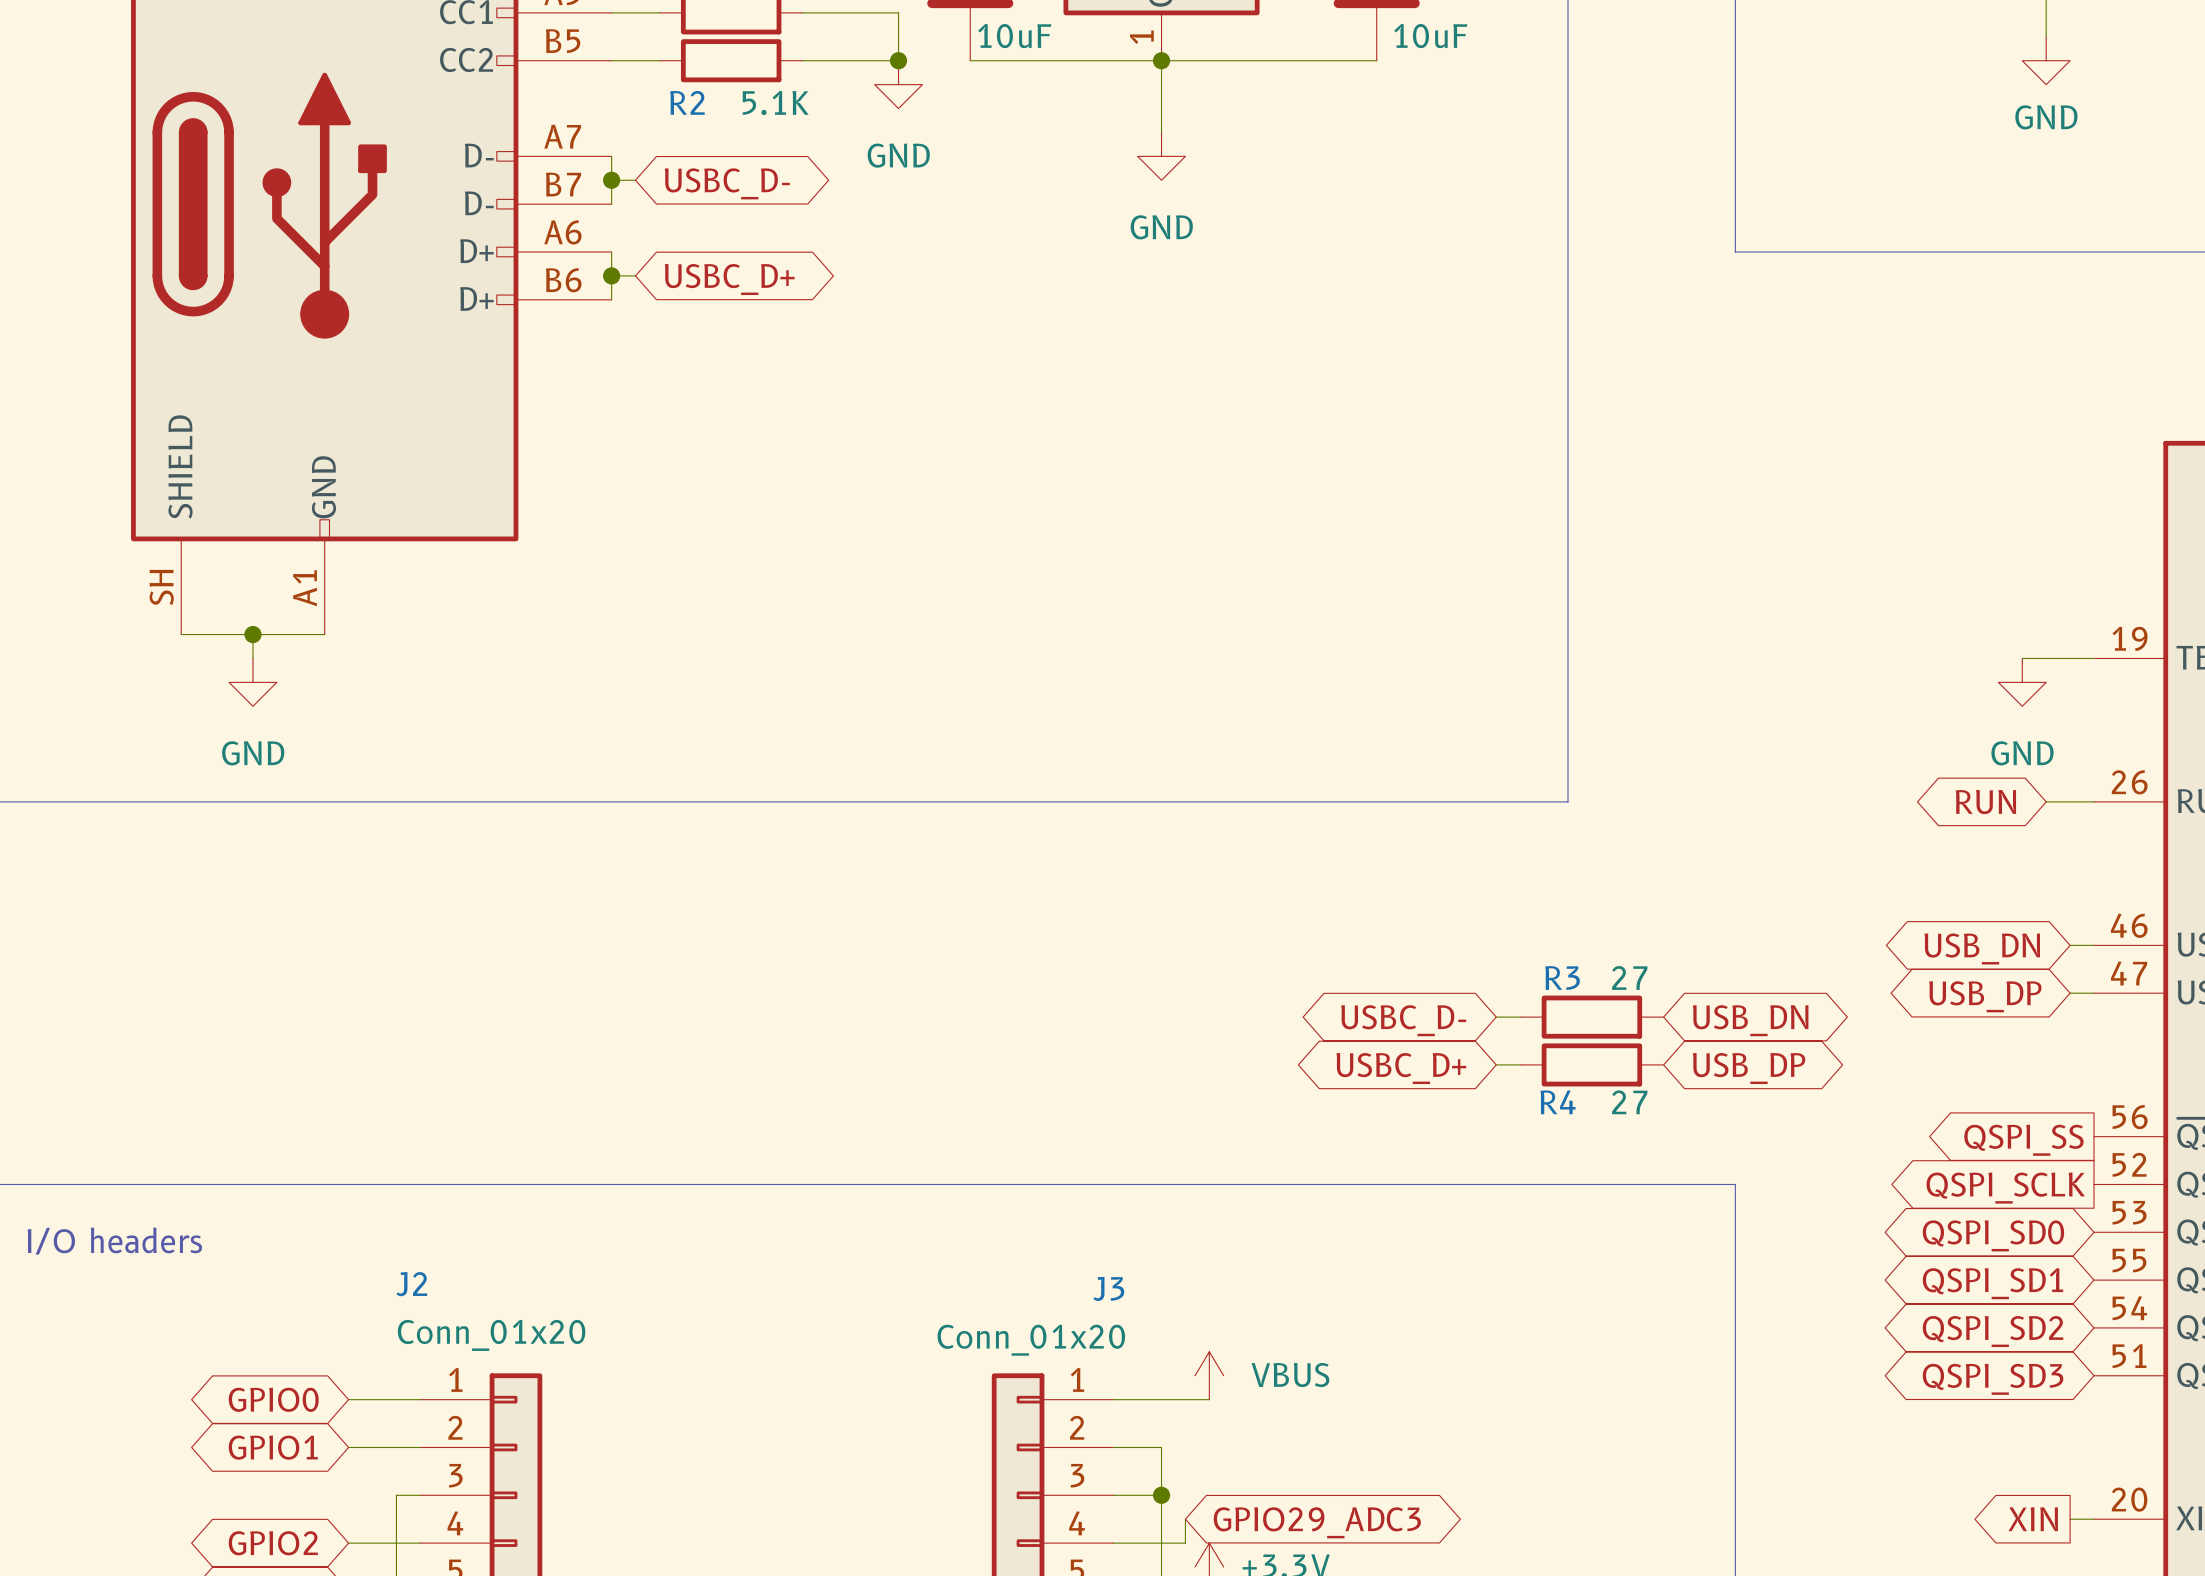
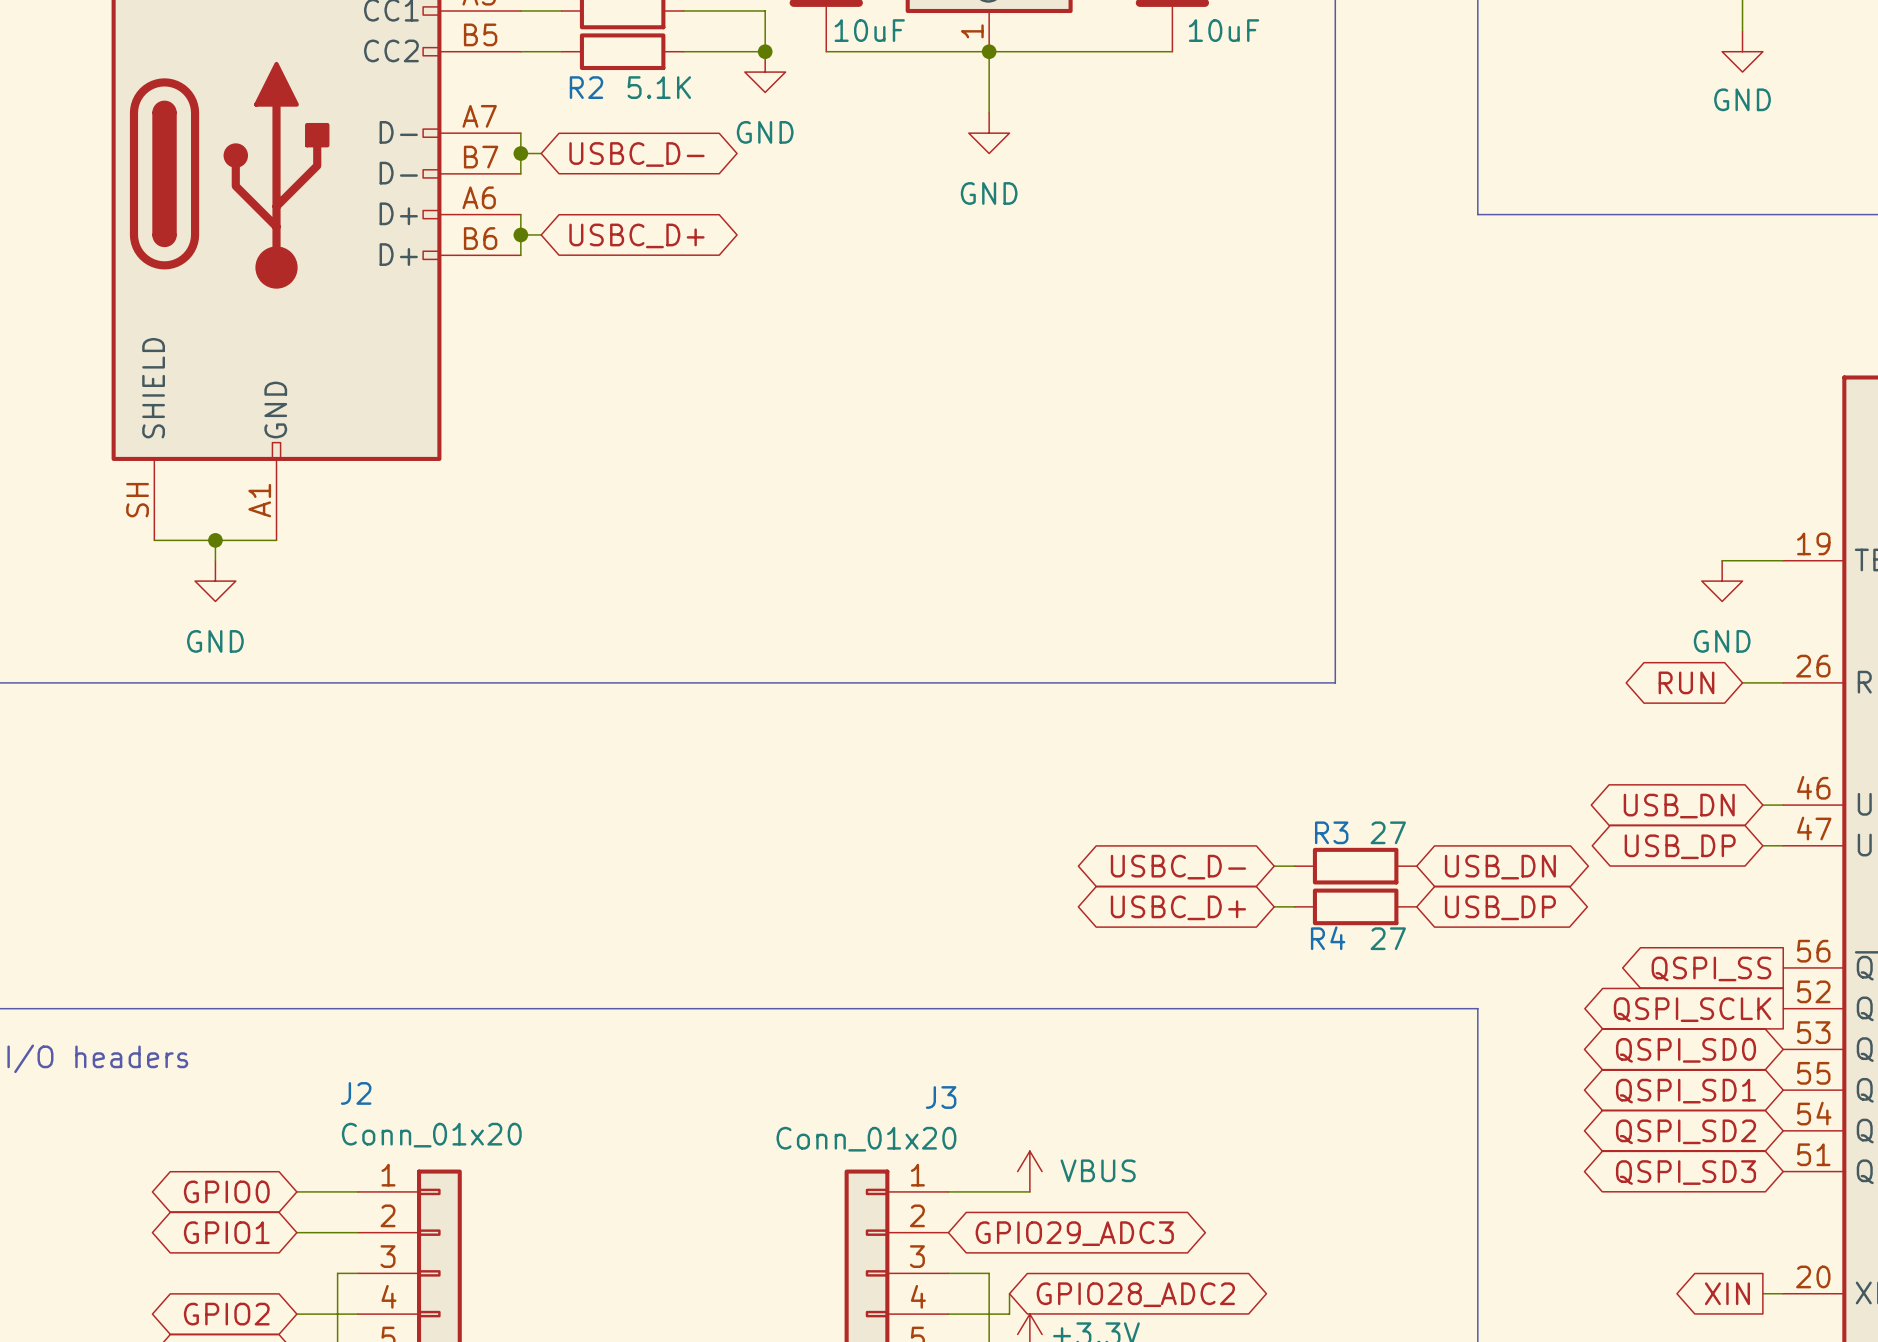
wire: (1113, 1447) (1161, 1447) (1161, 1495) -> none
global label: none -> GPIO29_ADC3 (1074, 1233)
junction: (1161, 1495) -> none
global label: GPIO29_ADC3 (1317, 1522) -> GPIO28_ADC2 (1135, 1294)

